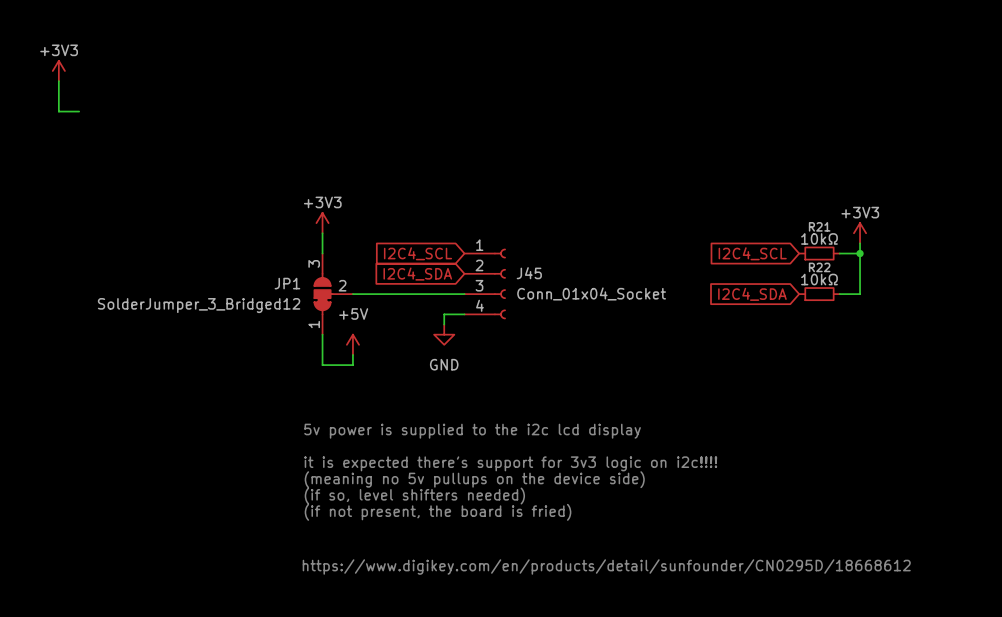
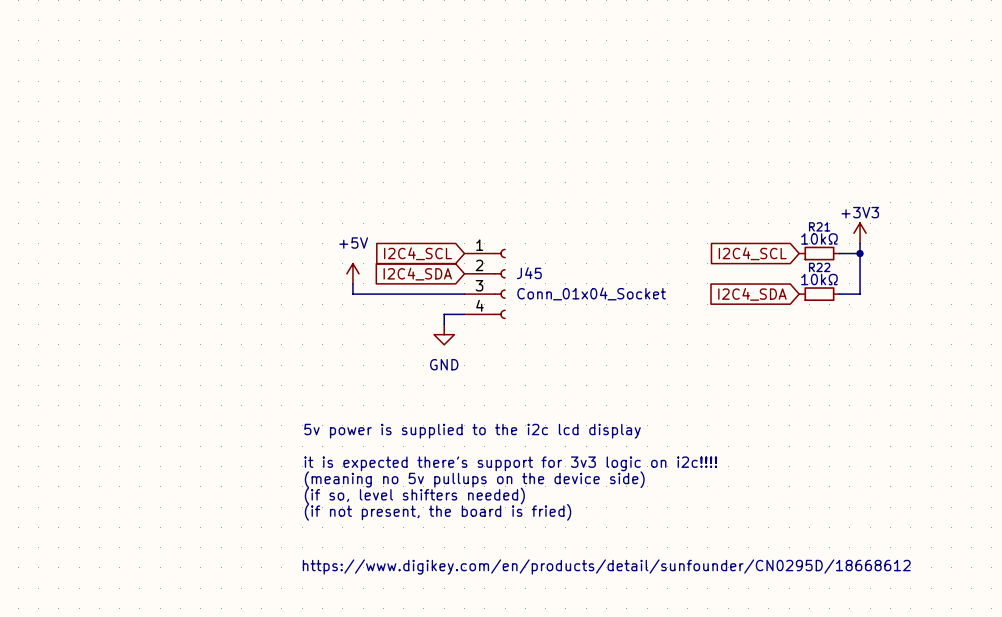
power symbol: +3V3 (58, 70) -> none
wire: (58, 81) (58, 111) (79, 111) -> none
power symbol: +3V3 (322, 223) -> none
wire: (322, 233) (322, 253) -> none
wire: none -> (352, 283) (352, 294)
JP1: SolderJumper_3_Bridged12 (333, 294) -> none
wire: (322, 334) (322, 365) (352, 365) (352, 354) -> none
power symbol position: +5V (352, 344) -> +5V (352, 273)

